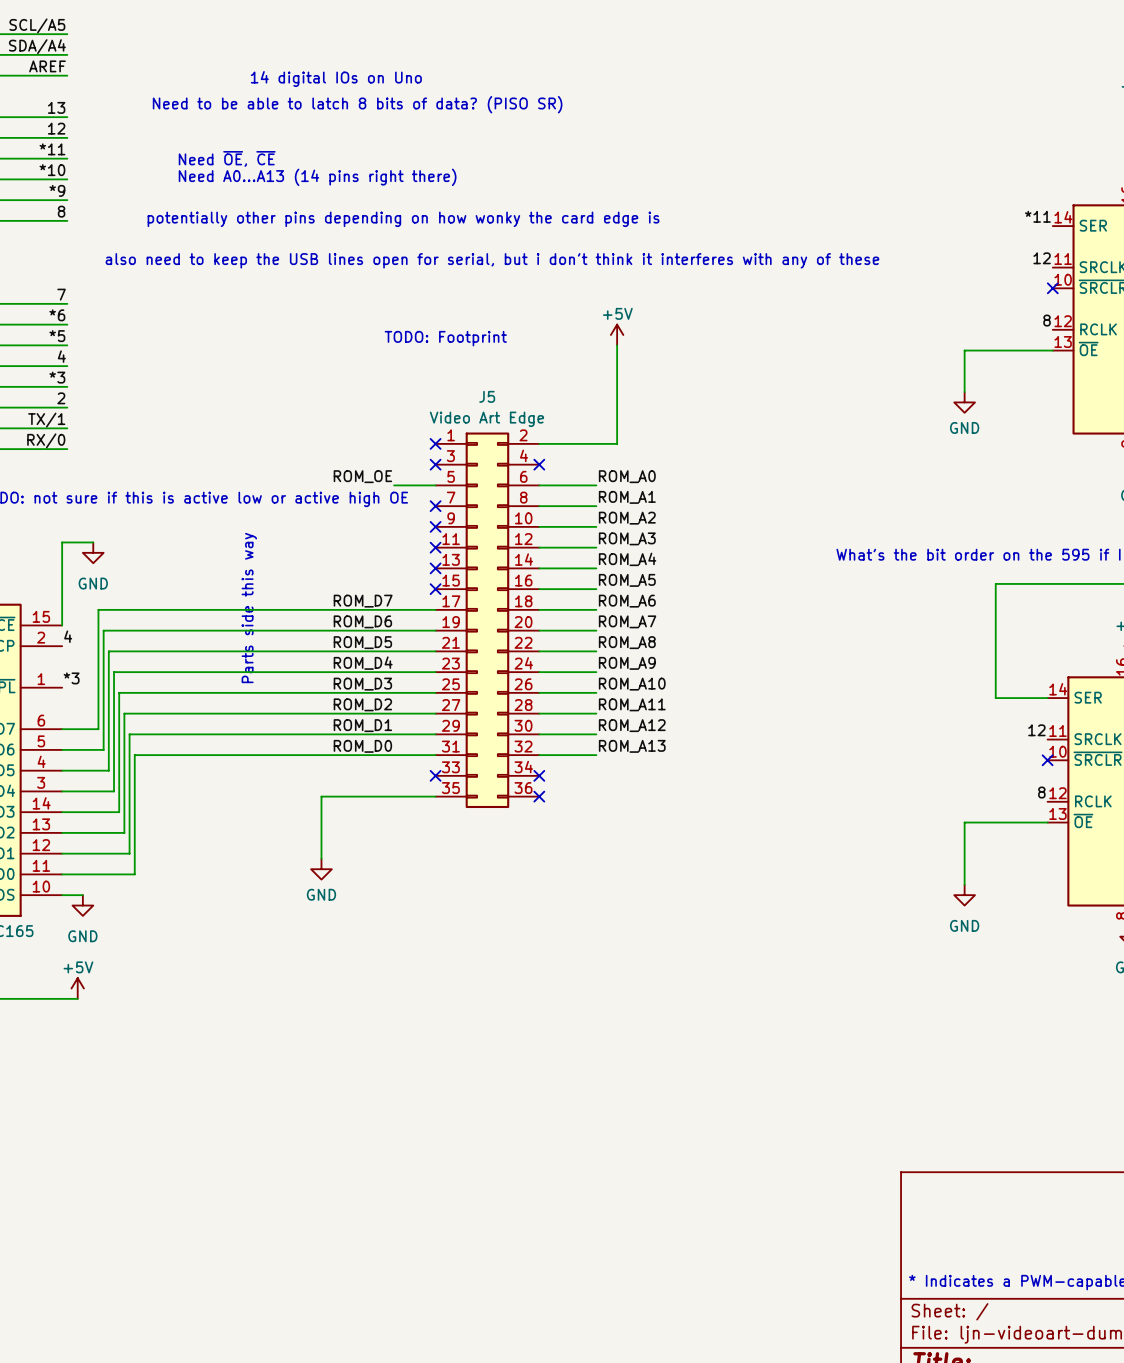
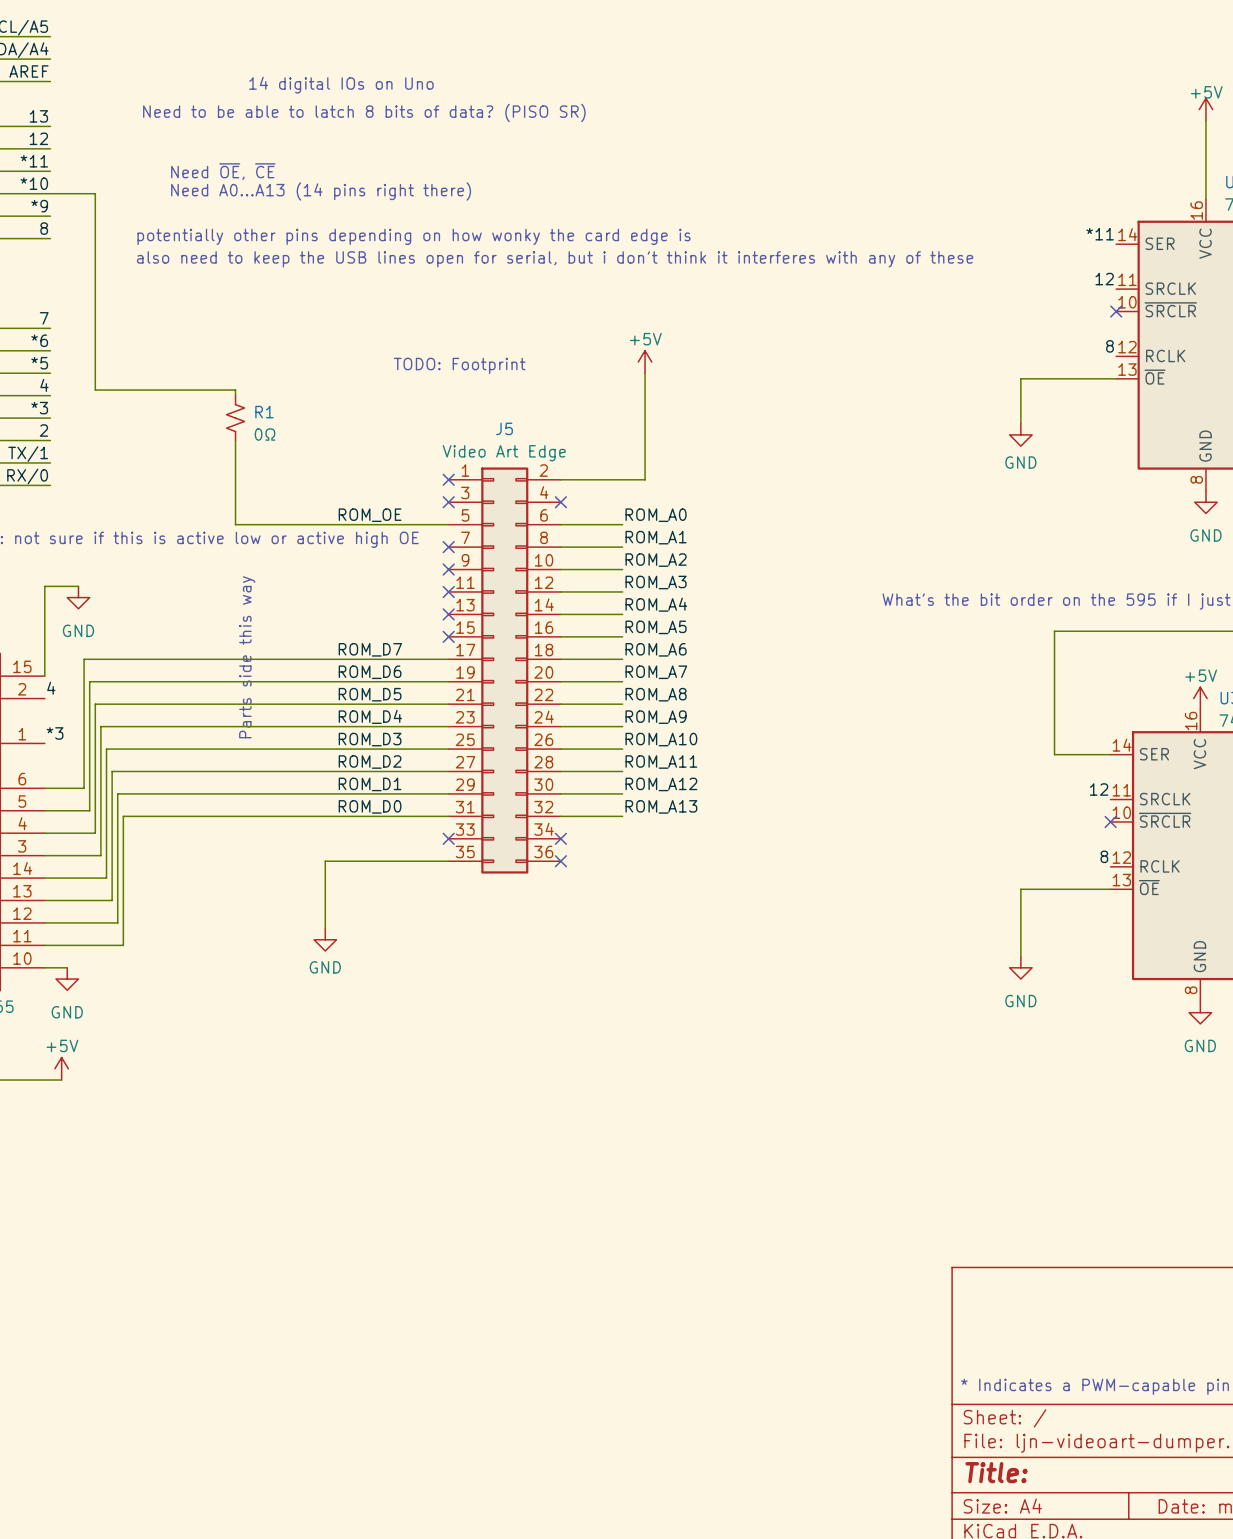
wire: none -> (50, 193) (95, 193) (95, 390) (235, 390) (235, 395)
text position: also need to keep the USB lines open for serial, but i don't think it interferes with any of these (492, 260) -> also need to keep the USB lines open for serial, but i don't think it interferes with any of these (555, 259)
R1: none -> 0Ω (235, 418)
wire: none -> (235, 440) (235, 524) (403, 524)

